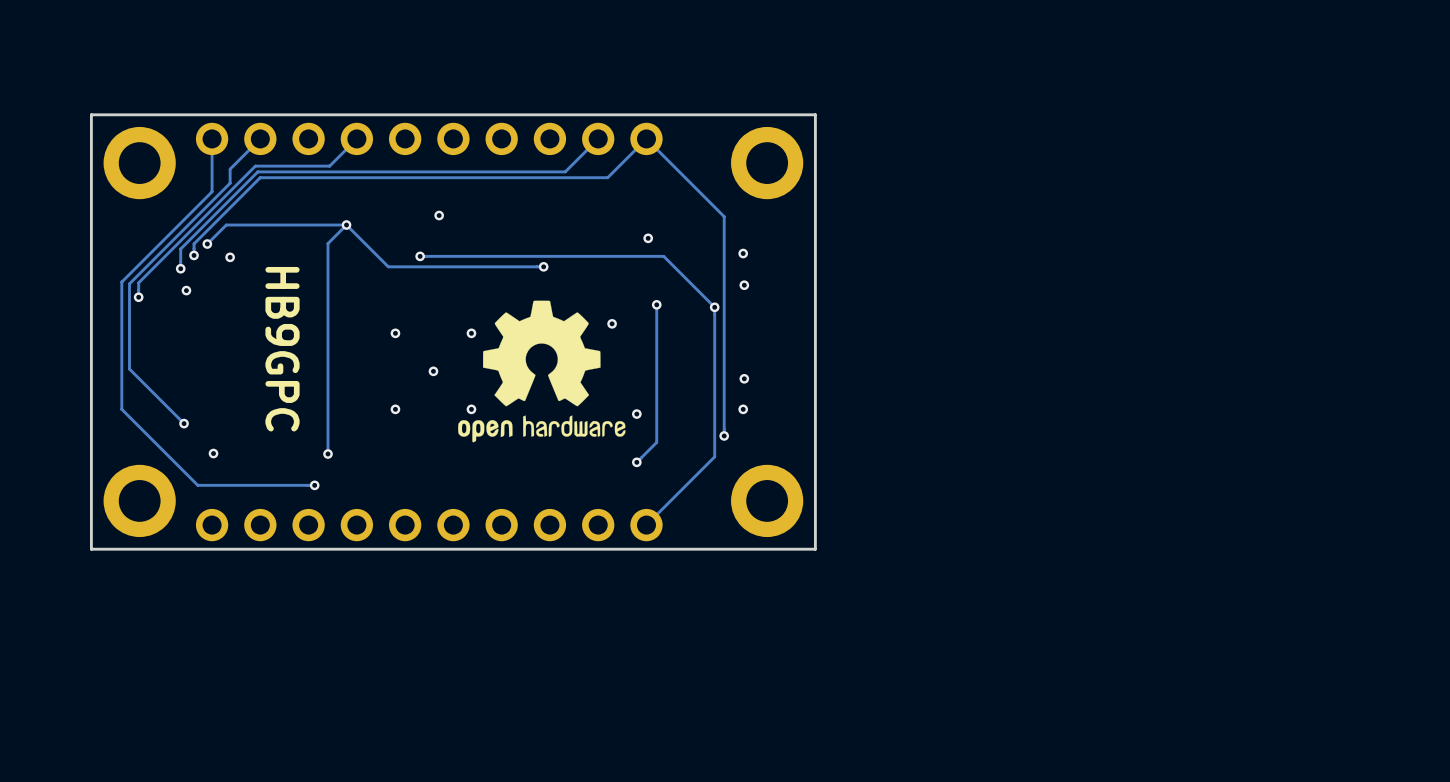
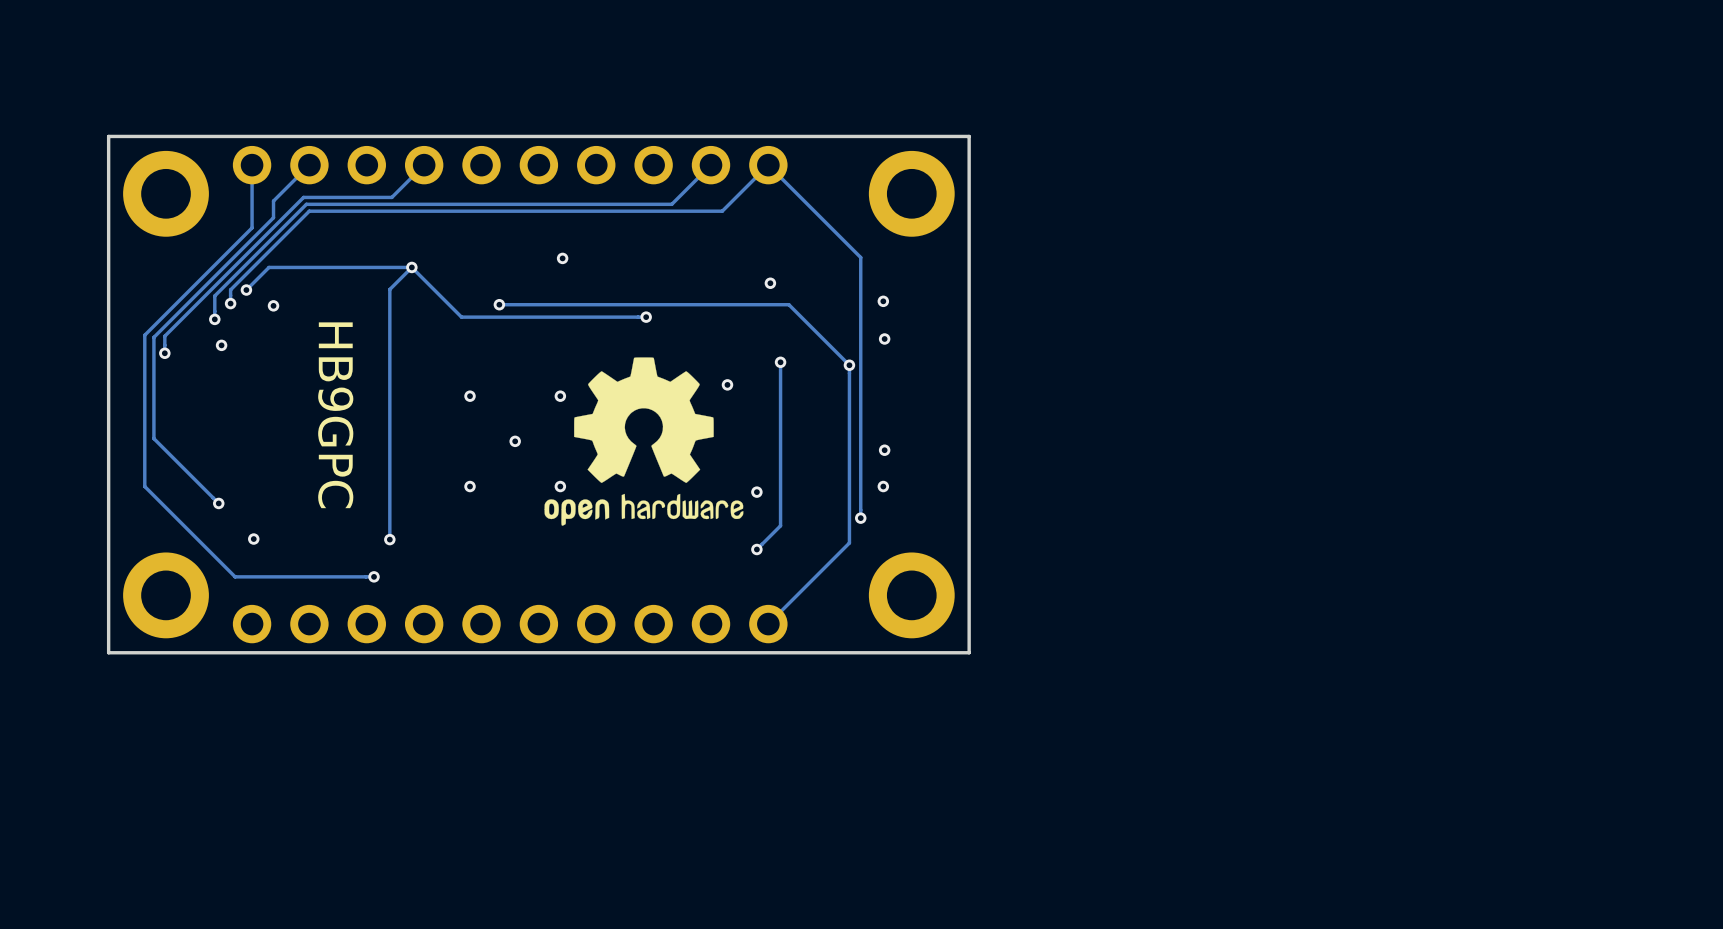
via position: (439, 215) -> (562, 258)

